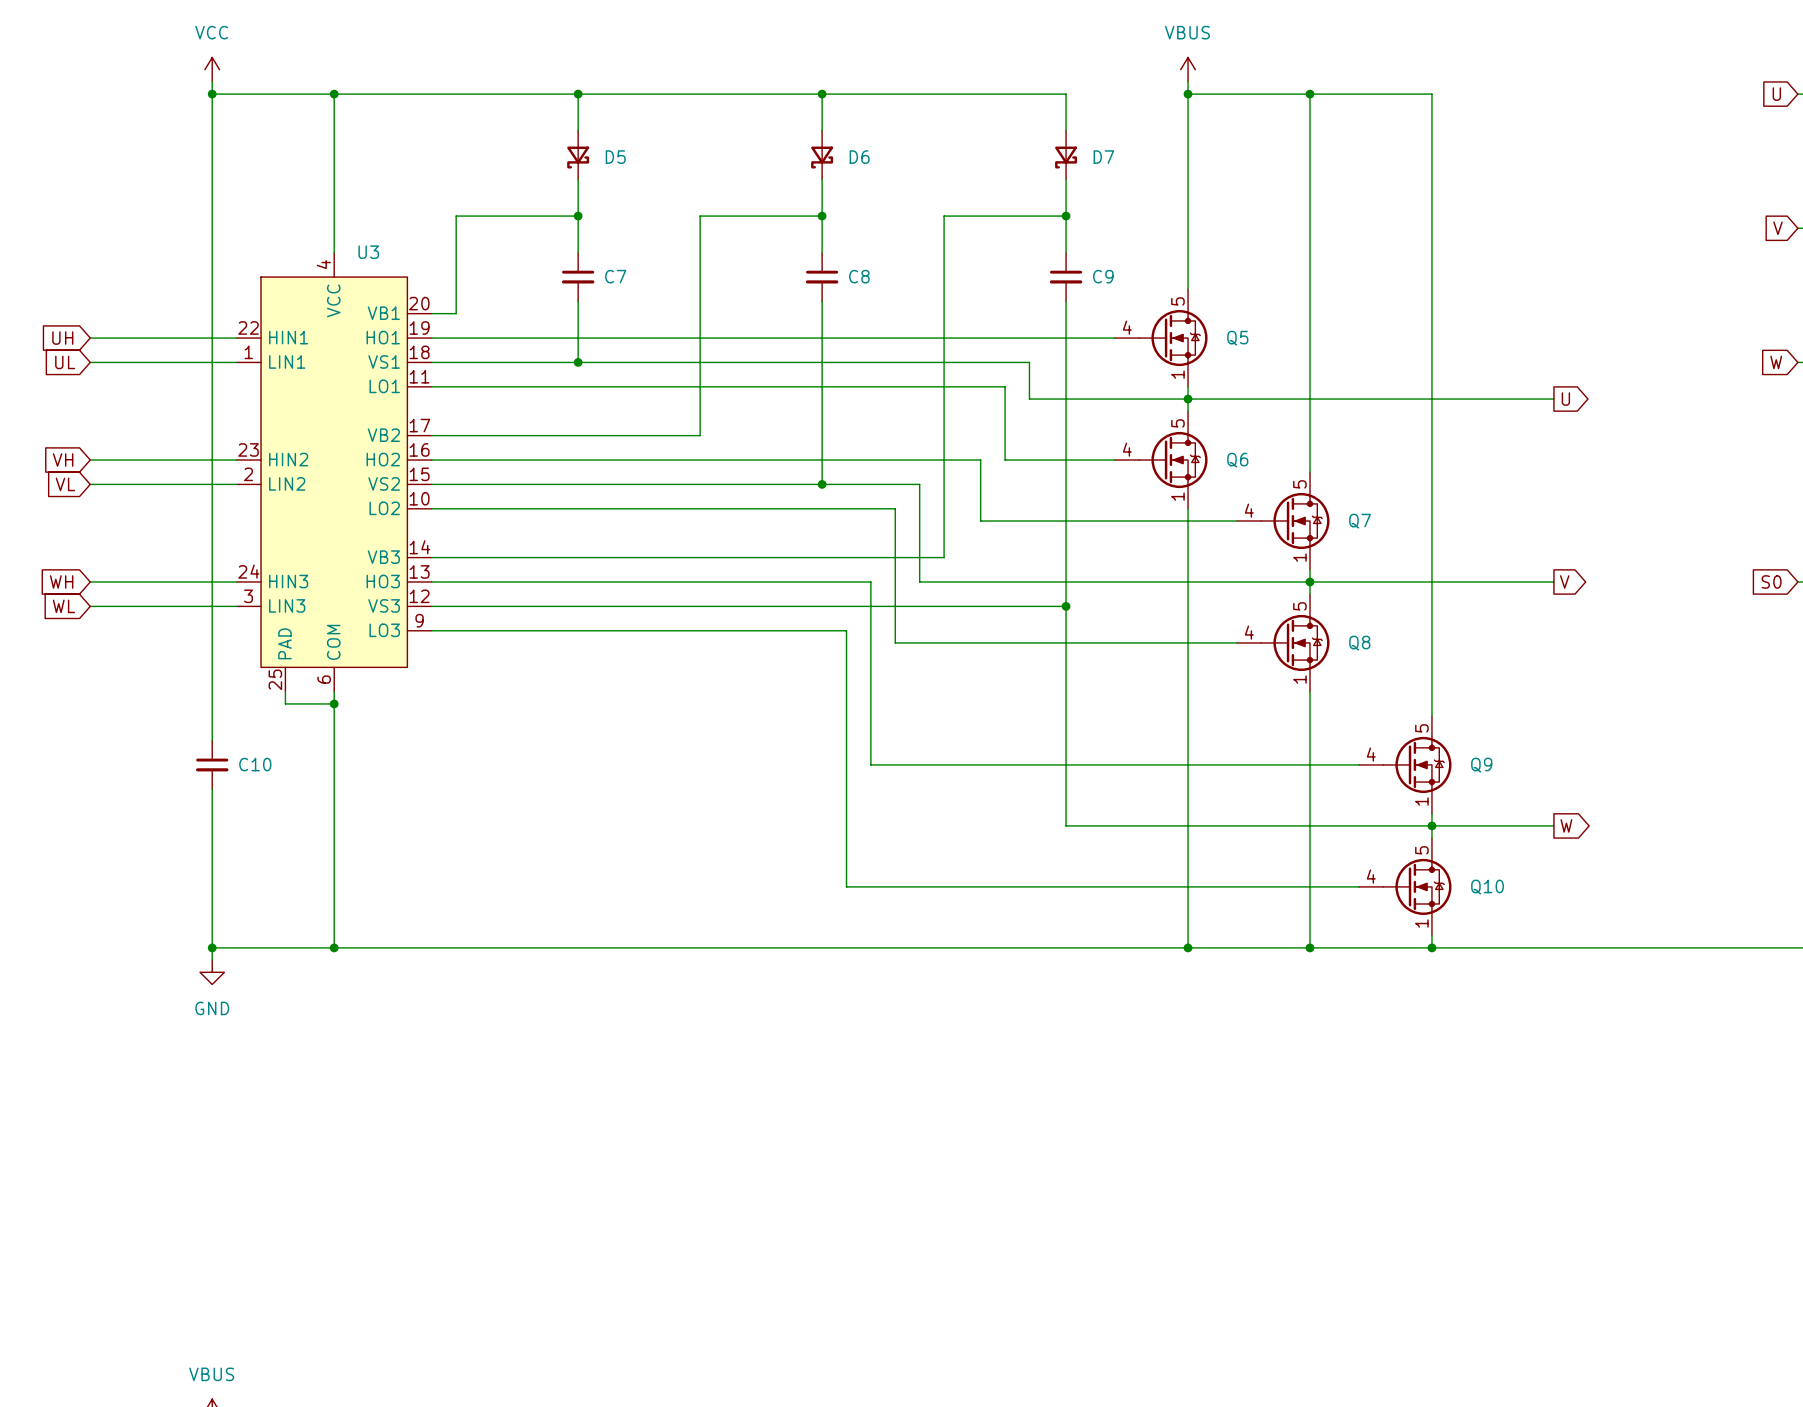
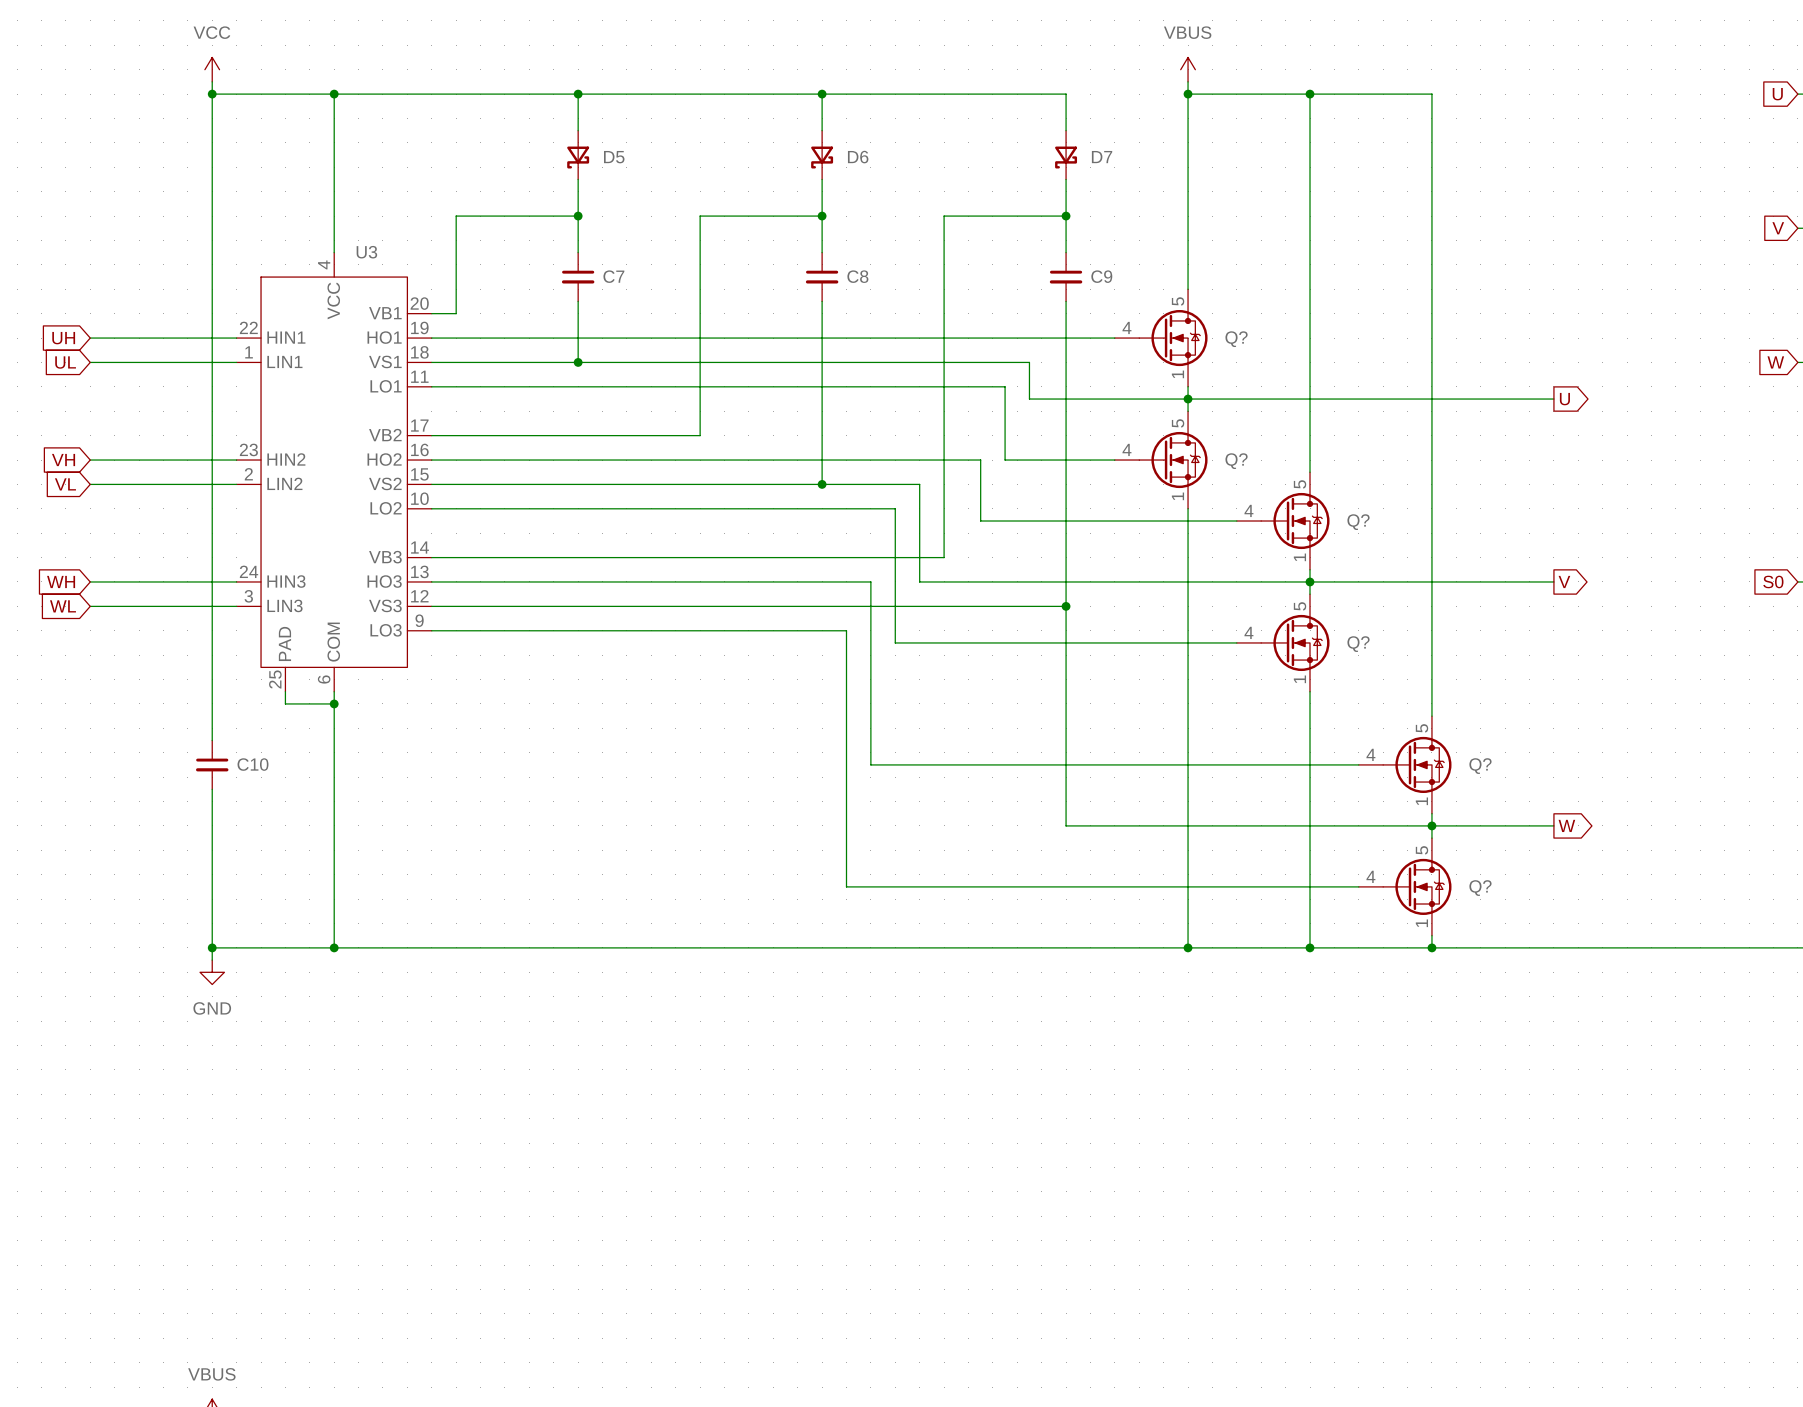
Q5 name: Q5 (1237, 338) -> Q? (1236, 339)
Q6 name: Q6 (1237, 460) -> Q? (1236, 461)
Q7 name: Q7 (1360, 521) -> Q? (1358, 522)
Q8 name: Q8 (1359, 643) -> Q? (1358, 644)
Q9 name: Q9 (1481, 765) -> Q? (1480, 766)
Q10 name: Q10 (1487, 887) -> Q? (1480, 888)

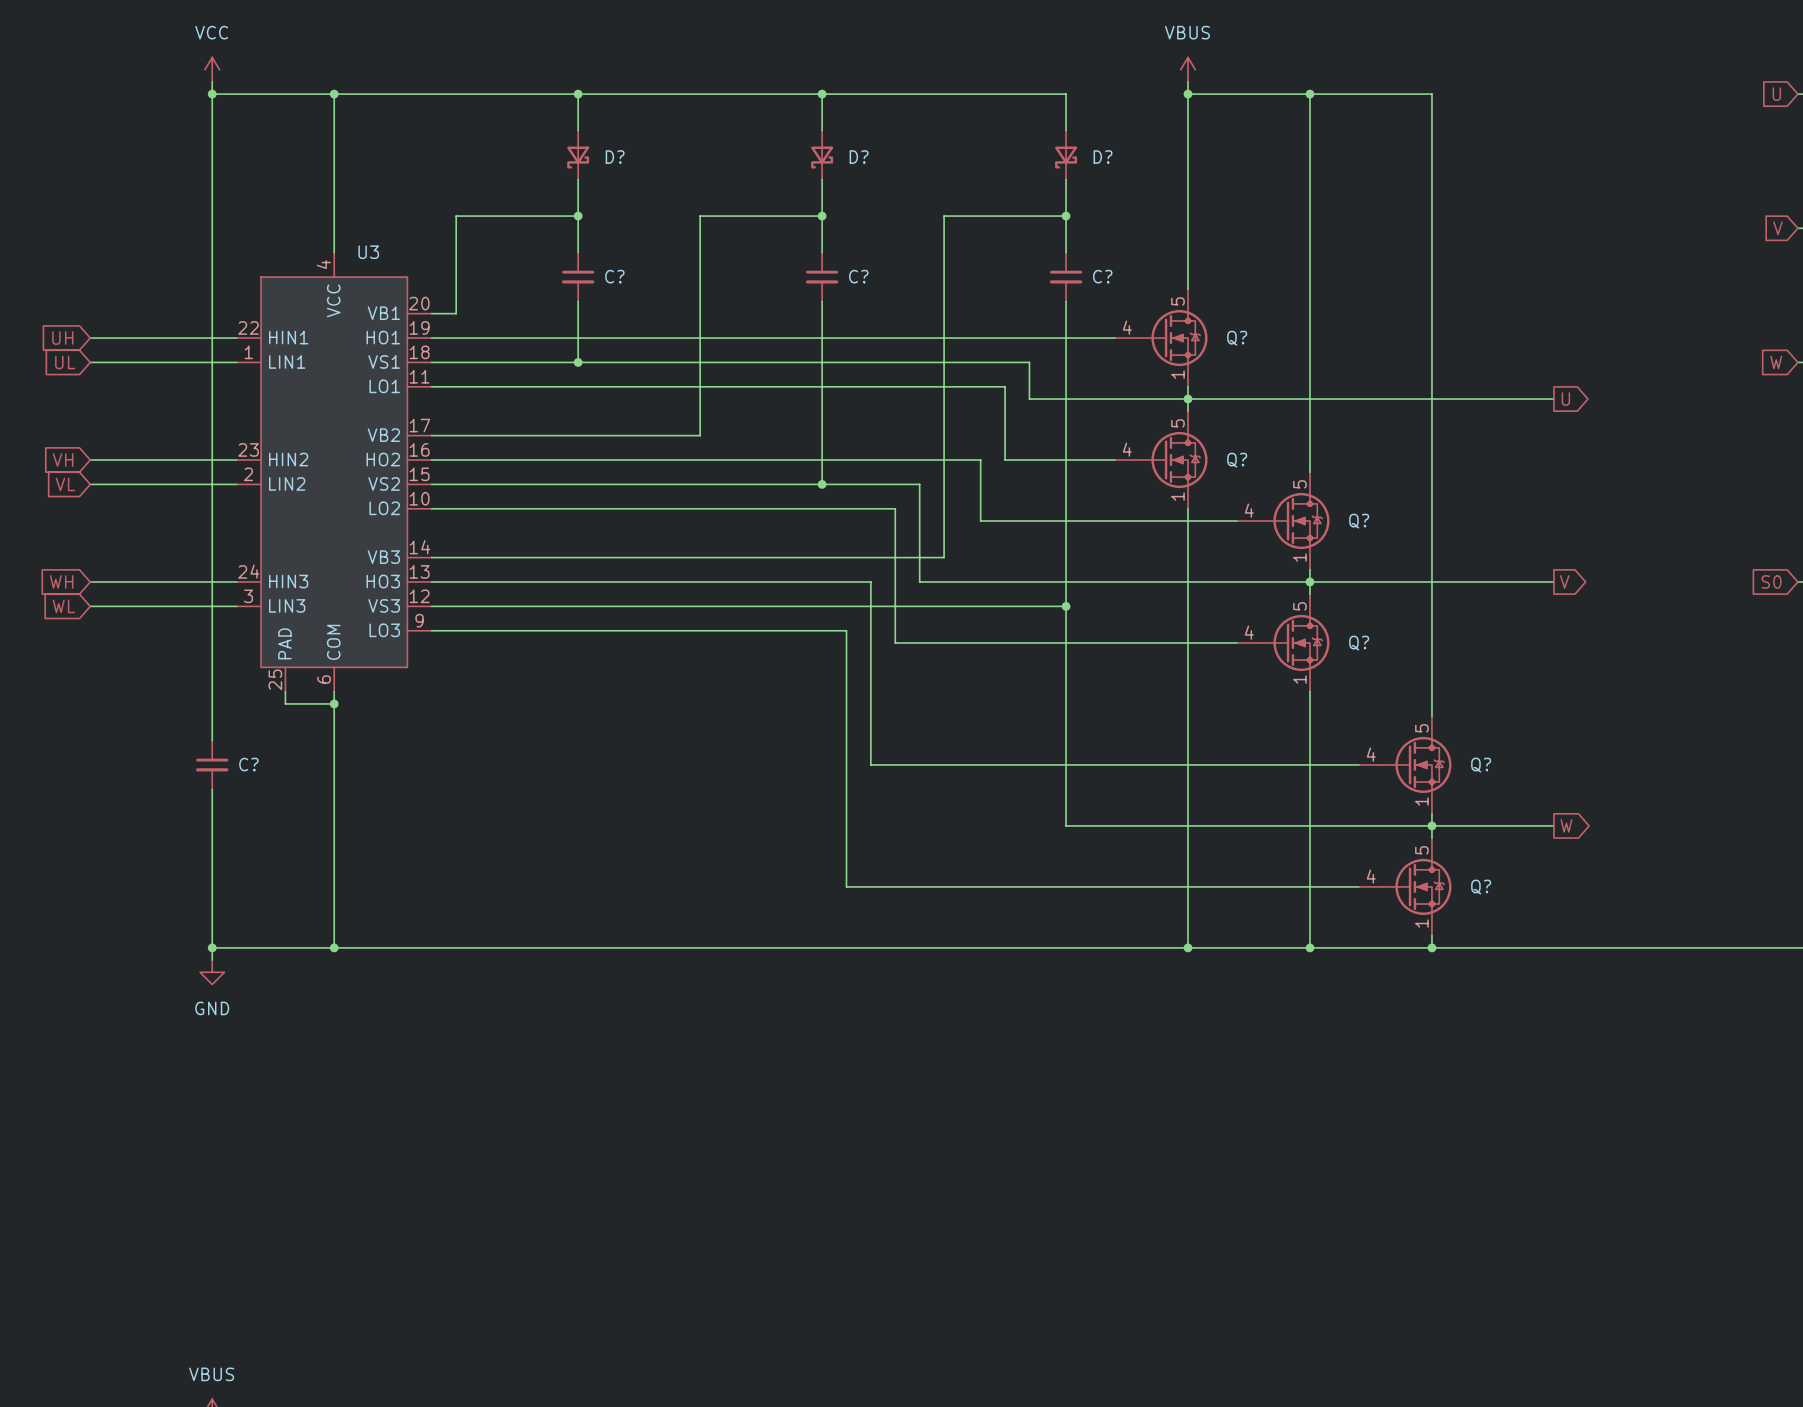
D5 name: D5 (614, 157) -> D? (615, 157)
D6 name: D6 (858, 157) -> D? (859, 157)
D7 name: D7 (1102, 157) -> D? (1103, 157)
C7 name: C7 (613, 276) -> C? (614, 276)
C8 name: C8 (857, 276) -> C? (858, 276)
C9 name: C9 (1101, 276) -> C? (1102, 276)
C10 name: C10 (252, 764) -> C? (248, 764)

